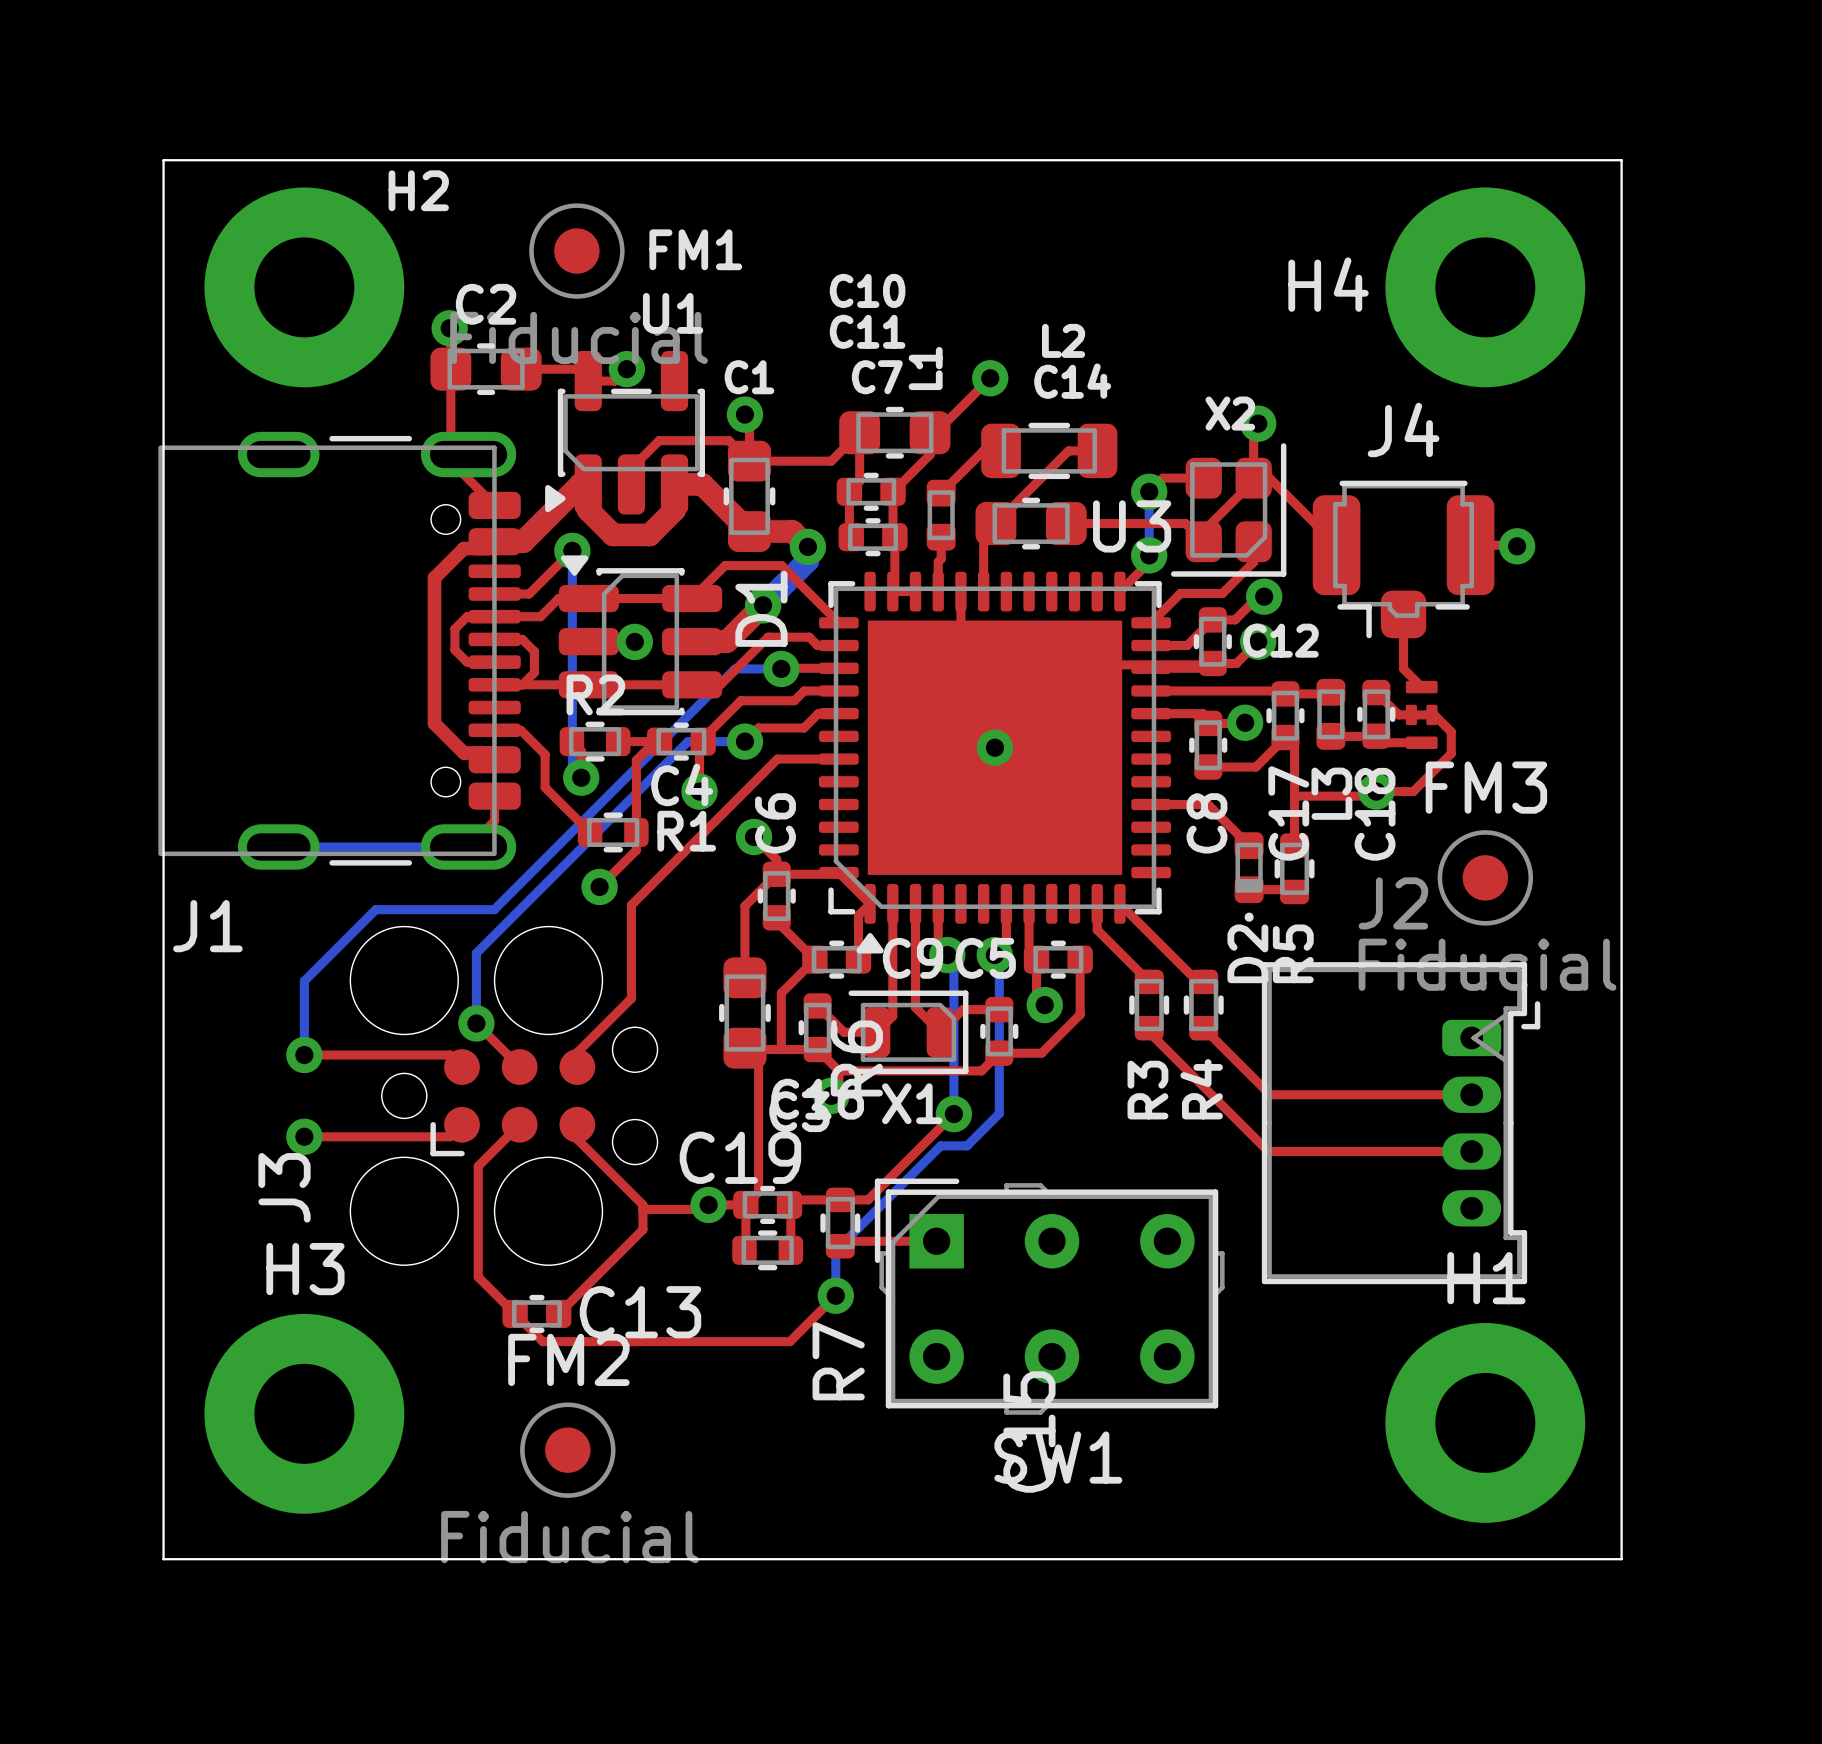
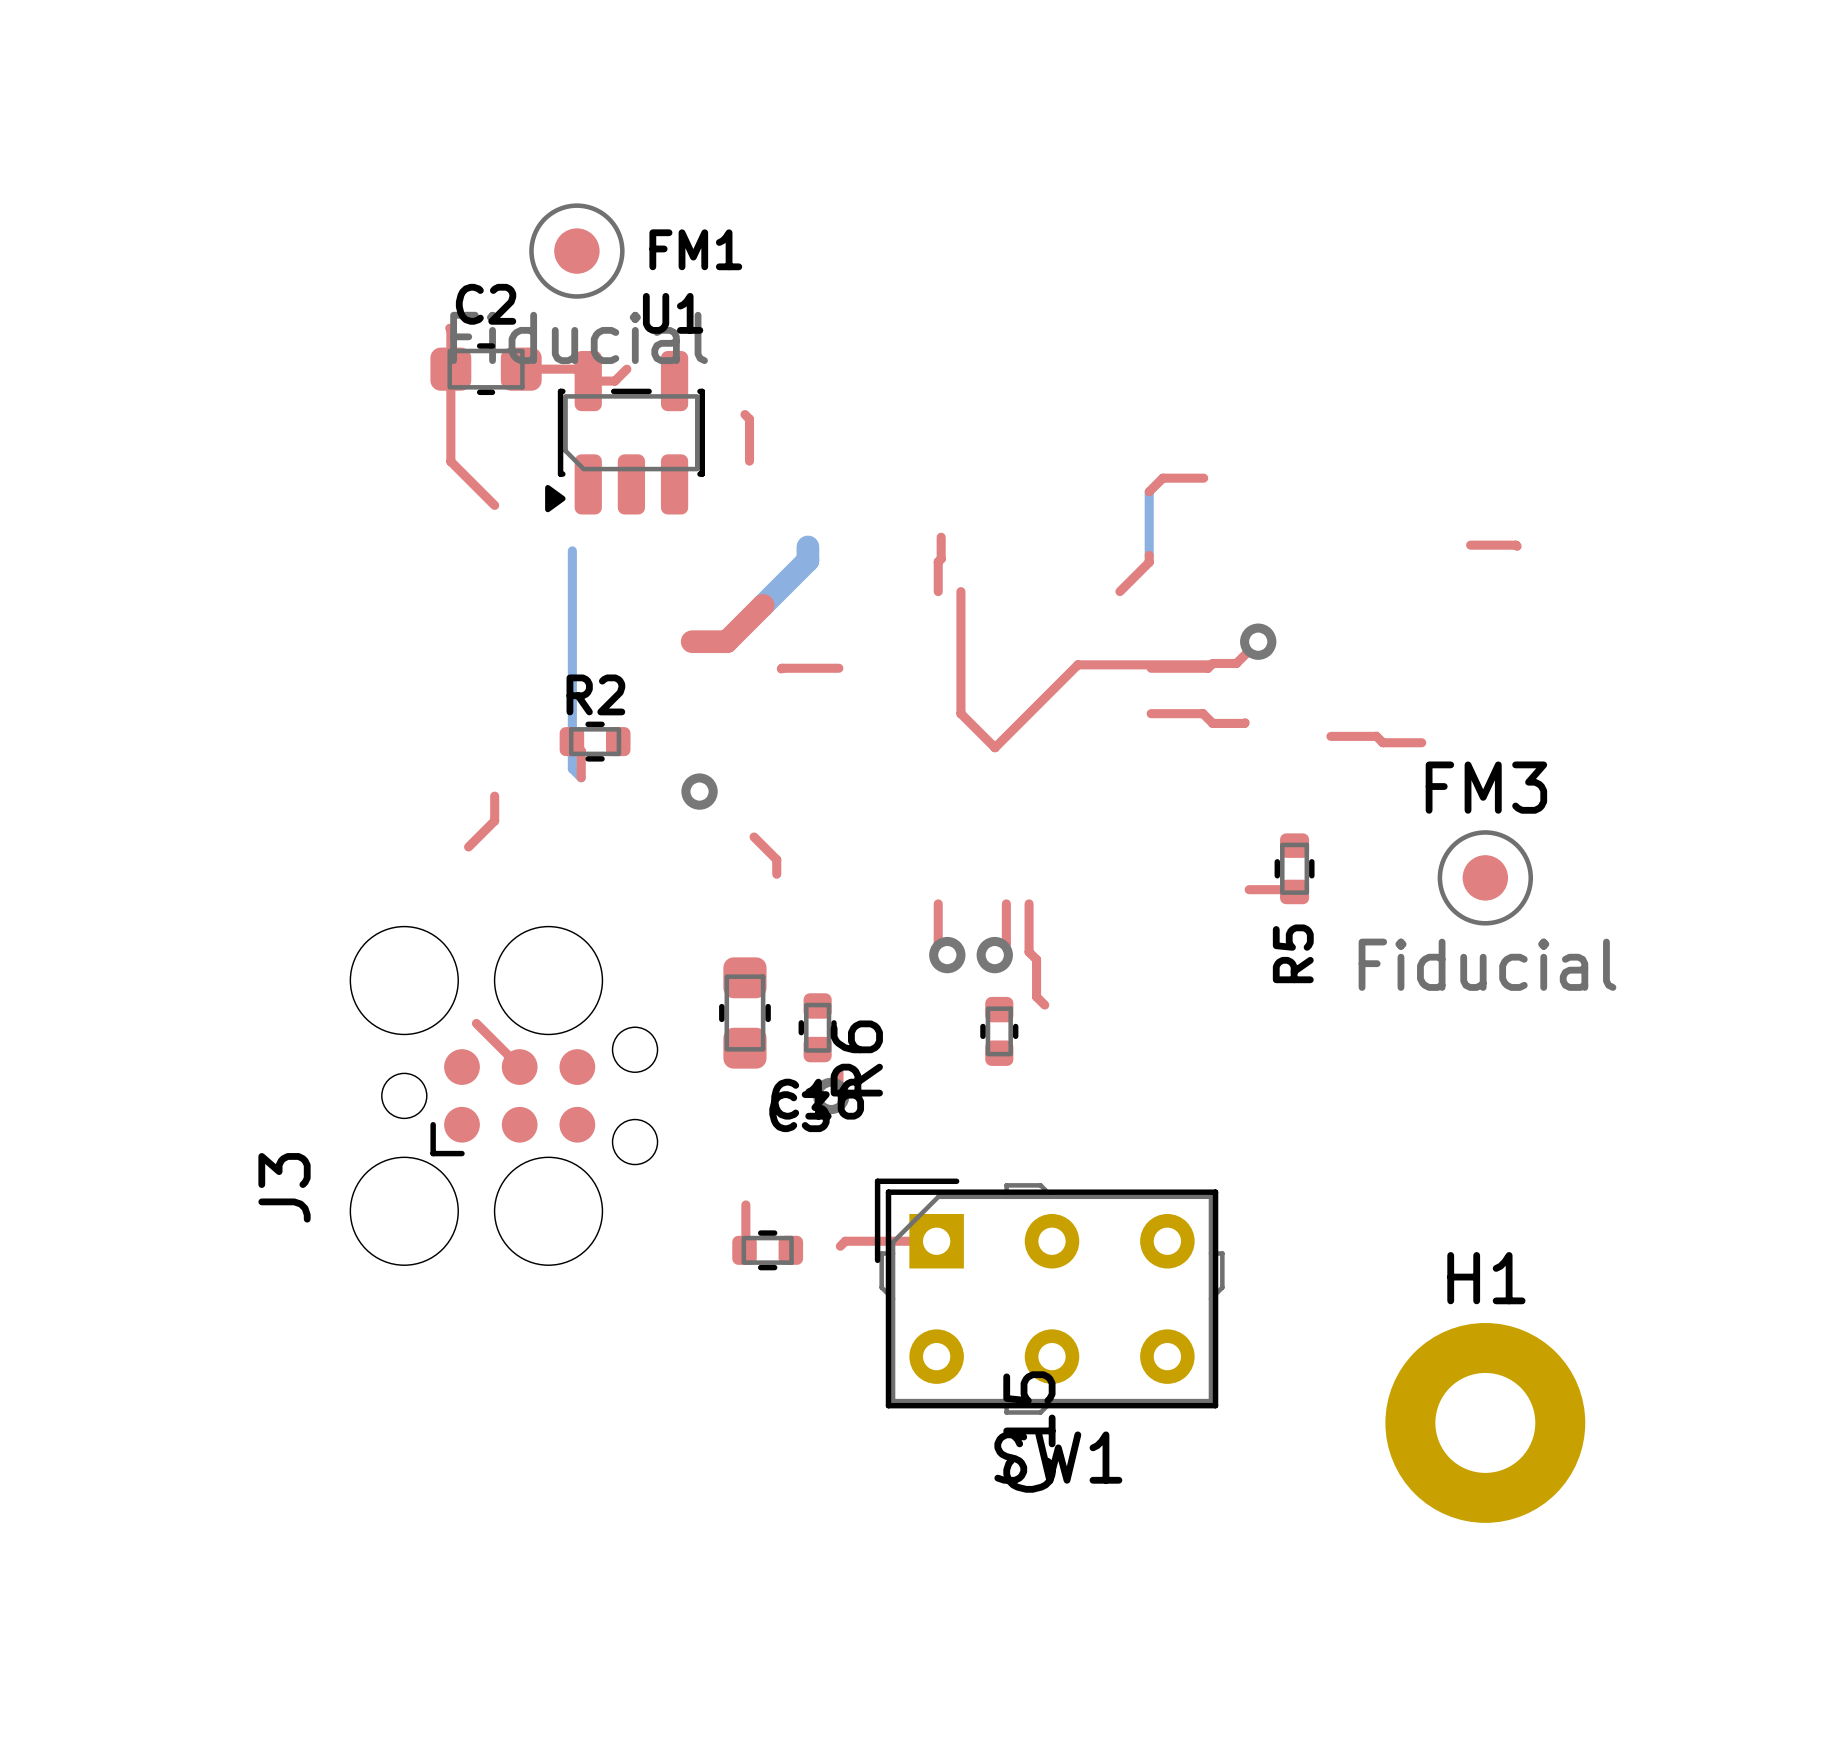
board edge: (163, 160) (1621, 160) (1621, 1559) (163, 1559) (163, 160) -> none
H2: (304, 287) -> none
H4: (1485, 287) -> none
via: (449, 328) -> none
via: (626, 369) -> none
top track: (990, 378) (935, 432) (930, 432) (930, 454) (893, 491) (894, 589) (892, 591) (915, 591) -> none
via: (990, 378) -> none
via: (744, 414) -> none
top track: (1258, 423) (1253, 428) (1253, 481) (1203, 530) (1203, 541) (1185, 523) (1066, 523) -> none
via: (1258, 423) -> none
C10: (894, 432) -> none
top track: (1001, 450) (983, 450) (941, 493) -> none
L2: (1049, 450) -> none
top track: (1097, 450) (1068, 450) (983, 535) (983, 591) -> none
top track: (1253, 478) (1269, 478) (1336, 545) -> none
top track: (631, 484) (631, 468) (659, 440) (729, 440) (749, 461) (831, 461) (859, 432) (859, 481) (849, 491) (849, 535) (851, 537) -> none
C11: (871, 491) -> none
via: (1149, 491) -> none
C1: (749, 496) -> none
X2: (1228, 509) -> none
L1: (941, 515) -> none
C14: (1031, 523) -> none
C7: (873, 537) -> none
top track: (1253, 541) (1253, 562) (1222, 593) (1180, 593) (1151, 622) -> none
top track: (807, 546) (792, 531) (749, 531) (702, 484) (674, 484) (674, 510) (649, 534) (613, 534) (588, 510) (588, 484) (580, 484) (523, 541) (494, 541) (487, 548) (463, 548) (434, 577) (434, 723) (463, 752) (487, 752) (494, 759) -> none
via: (807, 546) -> none
via: (1517, 546) -> none
top track: (572, 550) (529, 593) (494, 593) -> none
via: (572, 550) -> none
via: (1149, 555) -> none
J4: (1403, 559) -> none
top track: (1264, 596) (1258, 596) (1235, 619) (1212, 619) (1187, 645) (1151, 645) -> none
via: (1264, 596) -> none
via: (763, 605) -> none
top track: (1403, 614) (1403, 668) (1421, 687) -> none
top track: (838, 622) (781, 565) (725, 565) (692, 598) (558, 598) (540, 616) (467, 616) (454, 628) (454, 649) (467, 662) (494, 662) -> none
D1: (640, 635) -> none
top track: (494, 639) (522, 639) (534, 651) (534, 672) (522, 684) -> none
via: (634, 641) -> none
C12: (1212, 641) -> none
top track: (838, 645) (817, 645) (809, 637) (768, 637) (720, 684) (494, 684) -> none
J1: (339, 650) -> none
bottom track: (781, 668) (735, 668) (494, 909) (375, 909) (304, 981) (304, 1055) -> none
via: (781, 668) -> none
top track: (838, 690) (804, 690) (794, 700) (740, 700) (703, 738) (699, 745) (698, 790) -> none
top track: (1151, 690) (1275, 690) (1278, 693) (1329, 693) (1330, 692) -> none
top track: (1386, 692) (1376, 692) (1398, 714) (1434, 714) (1451, 731) (1451, 753) (1413, 791) (1376, 791) (1371, 796) (1294, 796) -> none
top track: (838, 713) (818, 713) (804, 728) (758, 728) (744, 741) -> none
L3: (1330, 714) -> none
C18: (1376, 714) -> none
part: (1421, 714) -> none
C17: (1285, 715) -> none
via: (1245, 722) -> none
top track: (494, 730) (520, 730) (545, 754) (545, 787) (590, 832) -> none
top track: (618, 741) (655, 741) (636, 760) (636, 850) (599, 886) -> none
C4: (681, 741) -> none
bottom track: (744, 741) (688, 741) (476, 953) (476, 1023) -> none
via: (744, 741) -> none
C8: (1208, 745) -> none
via: (995, 747) -> none
top track: (838, 759) (777, 759) (631, 905) (631, 998) (577, 1052) (577, 1067) -> none
U3: (995, 762) -> none
top track: (1212, 767) (1255, 767) (1285, 737) (1294, 746) (1294, 845) -> none
via: (581, 777) -> none
via: (1376, 791) -> none
top track: (1151, 804) (1208, 805) (1249, 845) -> none
R1: (613, 832) -> none
via: (754, 836) -> none
bottom track: (278, 846) (468, 846) -> none
D2: (1249, 876) -> none
via: (599, 886) -> none
C6: (776, 896) -> none
top track: (892, 903) (892, 1016) (876, 1032) (843, 1032) (817, 1005) -> none
top track: (915, 903) (915, 1007) (940, 1032) (962, 1009) (999, 1009) -> none
top track: (1097, 903) (1097, 929) (1149, 981) -> none
top track: (1119, 903) (1197, 981) (1203, 981) -> none
top track: (776, 917) (776, 921) (814, 959) (781, 993) (781, 1049) -> none
bottom track: (994, 955) (999, 959) (999, 1113) (967, 1145) (940, 1145) (835, 1250) (835, 1295) -> none
C9: (836, 959) -> none
top track: (858, 959) (858, 915) (870, 903) (838, 872) (837, 874) (776, 874) (744, 906) (744, 977) -> none
bottom track: (953, 959) (953, 1114) -> none
C5: (1058, 959) -> none
top track: (1080, 959) (1080, 1014) (1041, 1053) (999, 1053) (981, 1070) (838, 1070) (817, 1049) (758, 1049) (758, 1192) (745, 1204) (708, 1204) (704, 1209) (642, 1209) -> none
via: (1044, 1005) -> none
R3: (1149, 1005) -> none
R4: (1203, 1005) -> none
via: (476, 1023) -> none
top track: (1149, 1028) (1149, 1032) (1268, 1151) (1471, 1151) -> none
top track: (1203, 1028) (1270, 1094) (1471, 1094) -> none
X1: (908, 1032) -> none
top track: (304, 1055) (449, 1055) (461, 1067) -> none
via: (304, 1055) -> none
top track: (953, 1114) (868, 1199) (794, 1199) (789, 1204) (790, 1250) -> none
via: (953, 1114) -> none
J2: (1401, 1123) -> none
top track: (461, 1124) (449, 1136) (304, 1136) -> none
top track: (519, 1124) (478, 1166) (478, 1277) (542, 1341) (789, 1341) (835, 1295) -> none
top track: (577, 1124) (577, 1139) (642, 1204) (642, 1229) (558, 1313) -> none
via: (304, 1136) -> none
via: (708, 1204) -> none
C19: (767, 1204) -> none
R7: (840, 1223) -> none
via: (835, 1295) -> none
C13: (536, 1313) -> none
H3: (304, 1413) -> none
FM2: Fiducial (567, 1450) -> none

